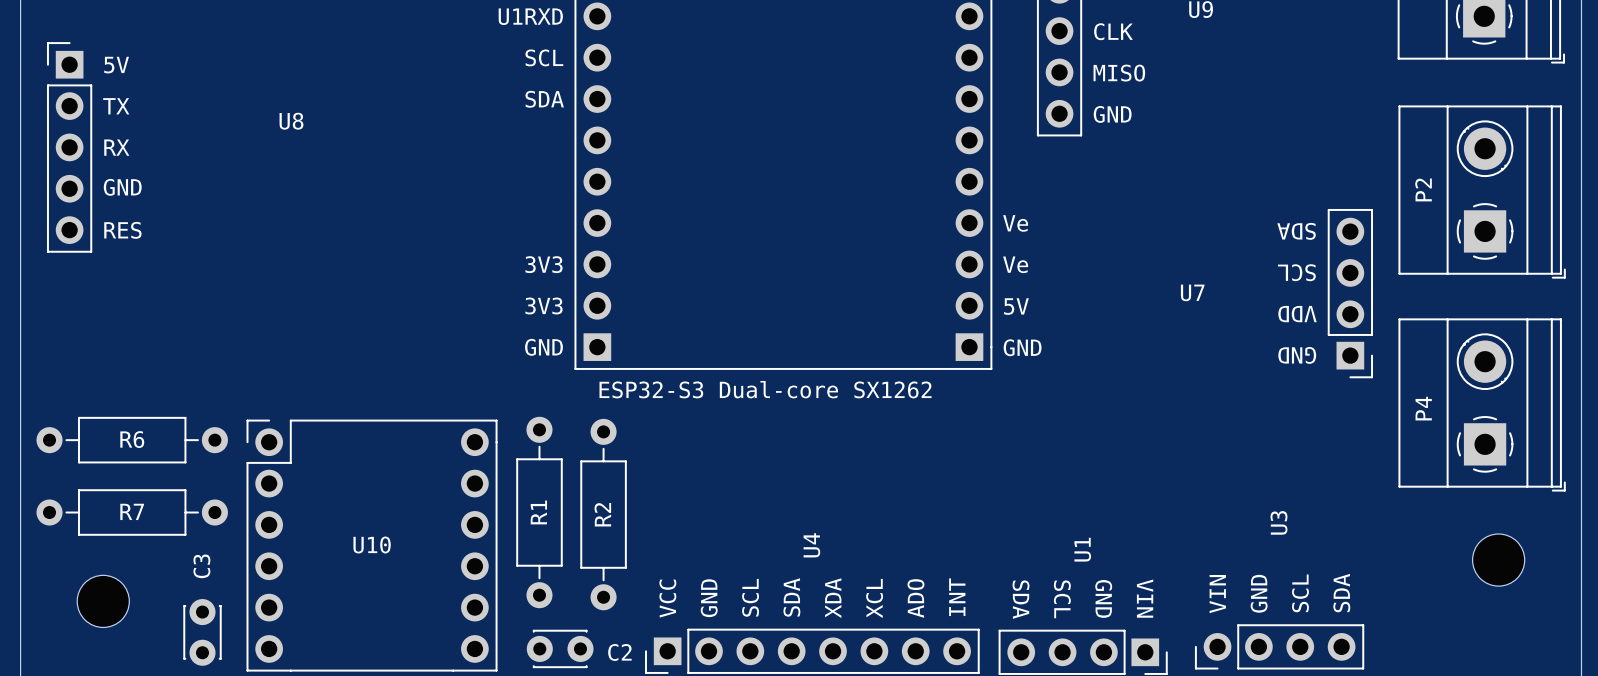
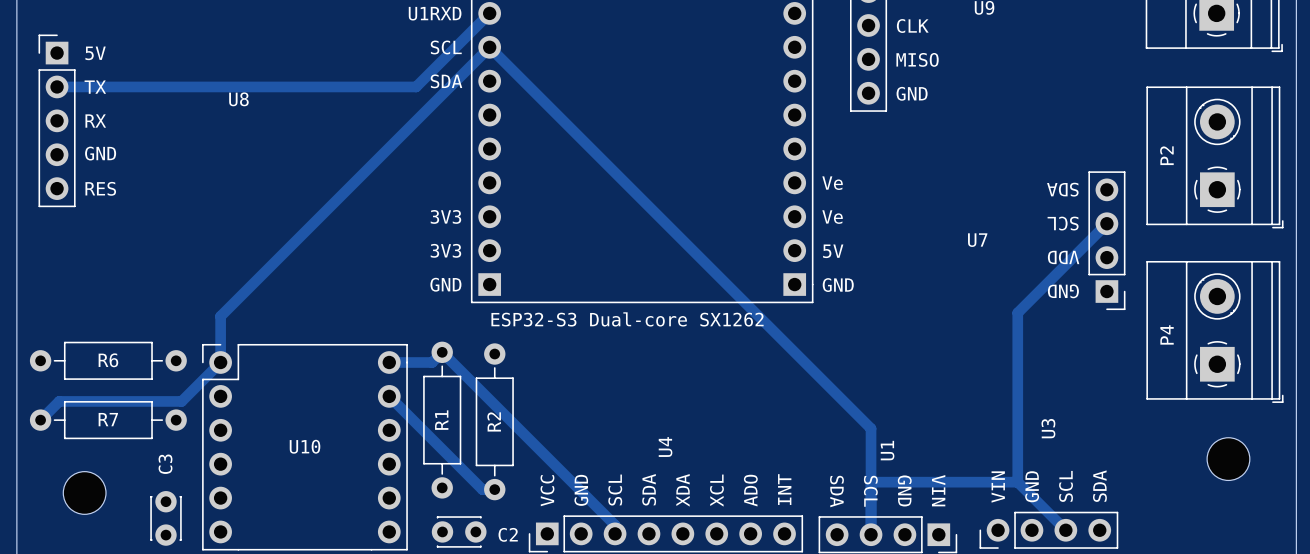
track: none -> (489, 13) (416, 86) (57, 86)
track: none -> (1106, 223) (1017, 312) (1017, 482)
track: none -> (389, 362) (432, 362) (442, 352) (615, 525) (615, 533)
track: none -> (389, 396) (482, 489) (494, 489)
track: none -> (40, 420) (59, 401) (181, 401) (220, 362) (220, 316) (489, 47) (871, 428) (871, 534)
track: none -> (871, 482) (1017, 482)
track: none -> (1017, 482) (1065, 530)

